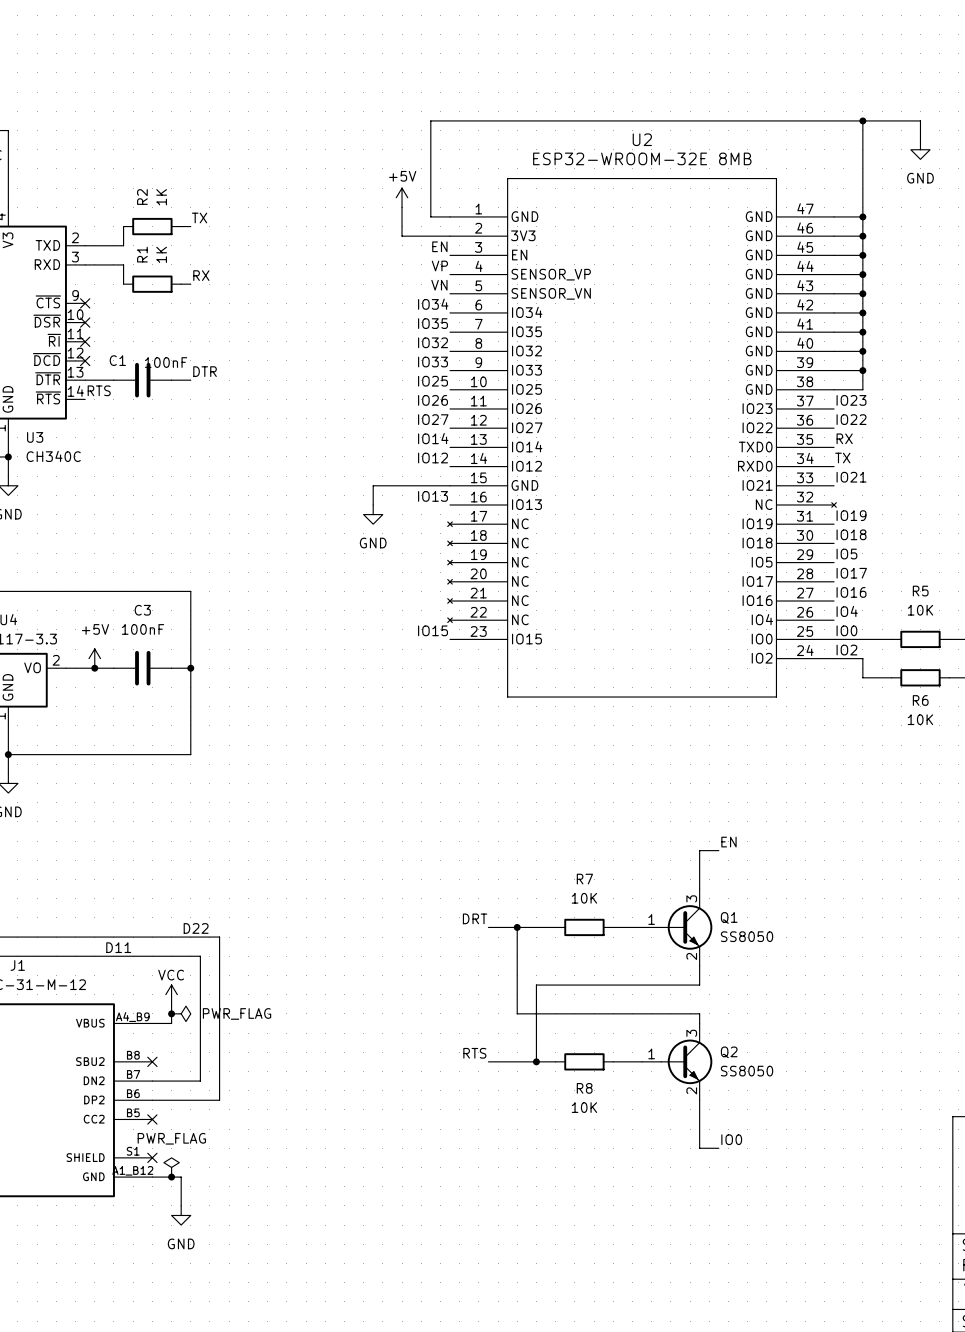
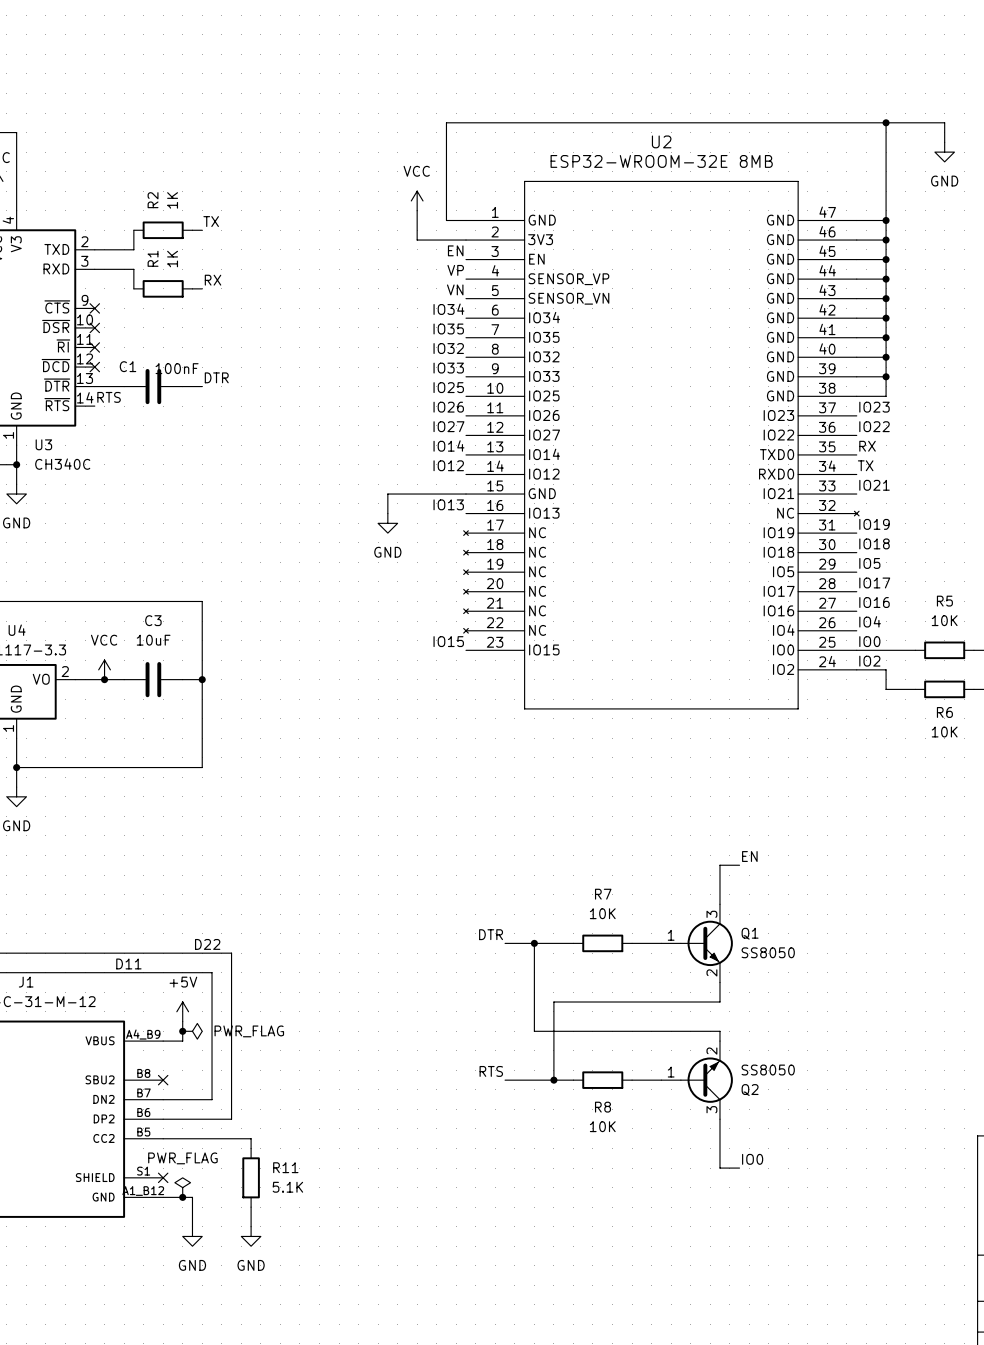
power symbol: +5V (402, 197) -> VCC (417, 200)
C3 value: 100nF (143, 629) -> 10uF (153, 640)
power symbol: +5V (94, 658) -> VCC (104, 669)
label: DRT (475, 918) -> DTR (491, 934)
power symbol: VCC (171, 994) -> +5V (182, 1011)
Q2 flip: as is (686, 1061) -> up-down (706, 1080)
wire: none -> (163, 1138) (251, 1138) (251, 1148)
no-connect mark: (152, 1119) -> none
R11: none -> 5.1K (251, 1177)
wire: none -> (251, 1207) (251, 1226)
power symbol: none -> GND (251, 1236)

